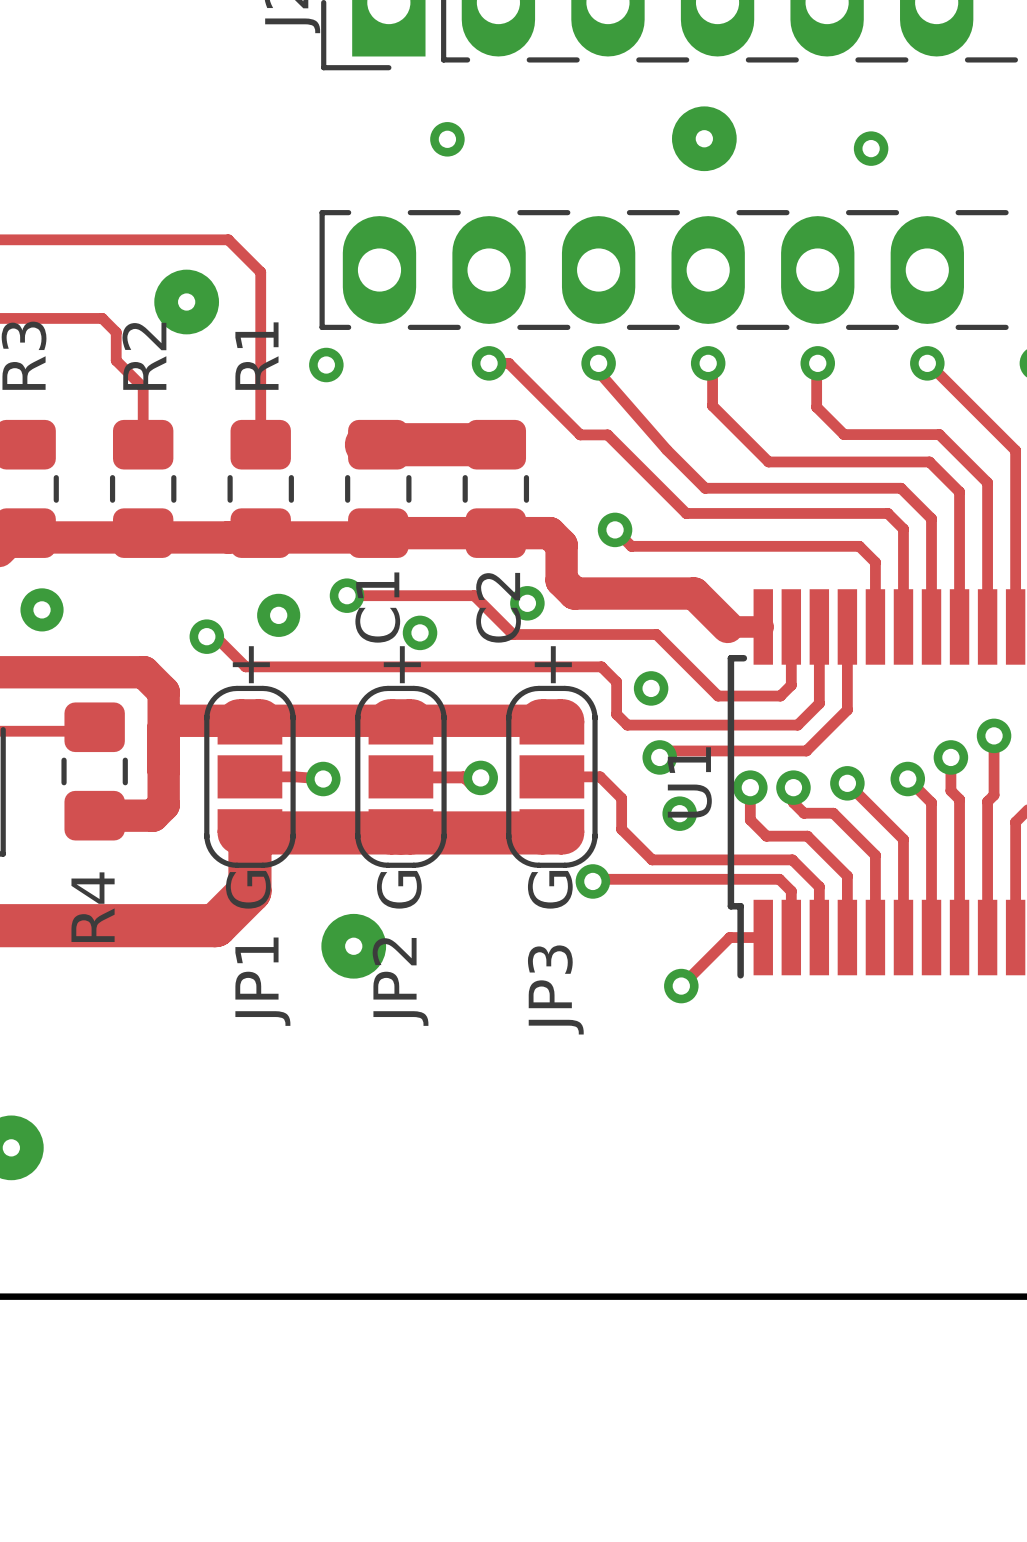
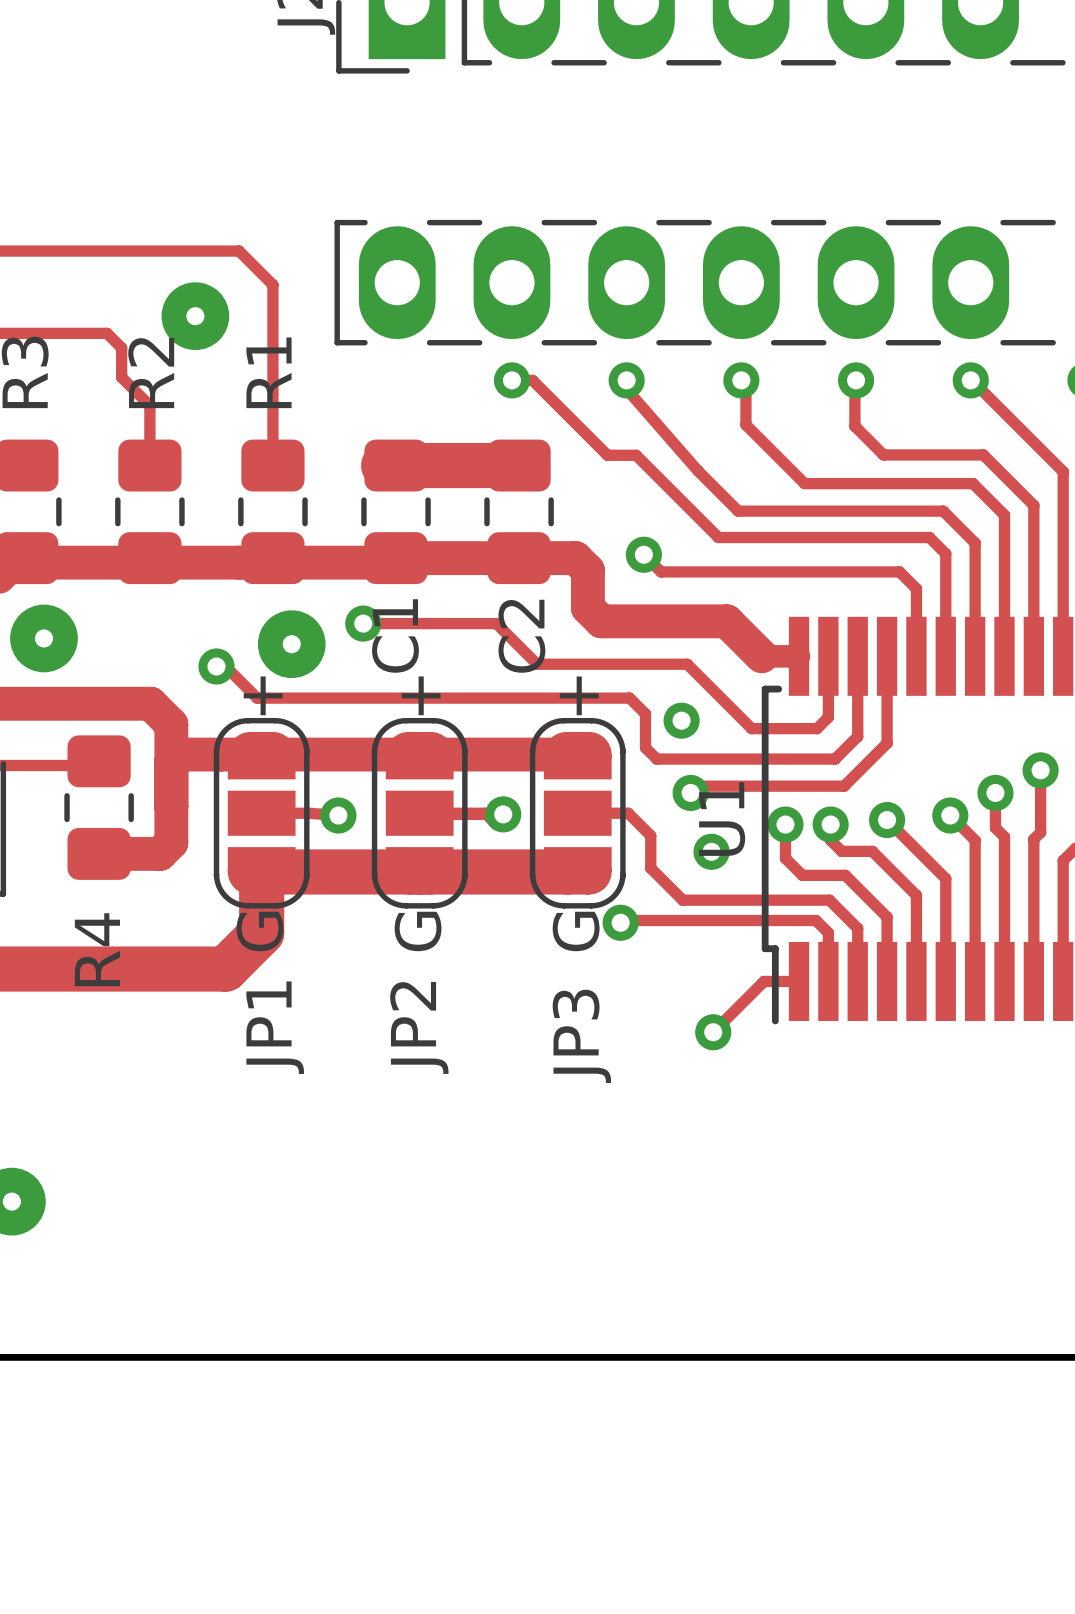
via: (704, 138) -> none
via: (447, 139) -> none
via: (871, 148) -> none
via: (326, 365) -> none
via size: [20, 588, 64, 632] -> [10, 604, 78, 673]
via size: [257, 593, 301, 637] -> [257, 610, 326, 679]
via: (527, 603) -> none
via: (420, 632) -> none
via: (353, 946) -> none

